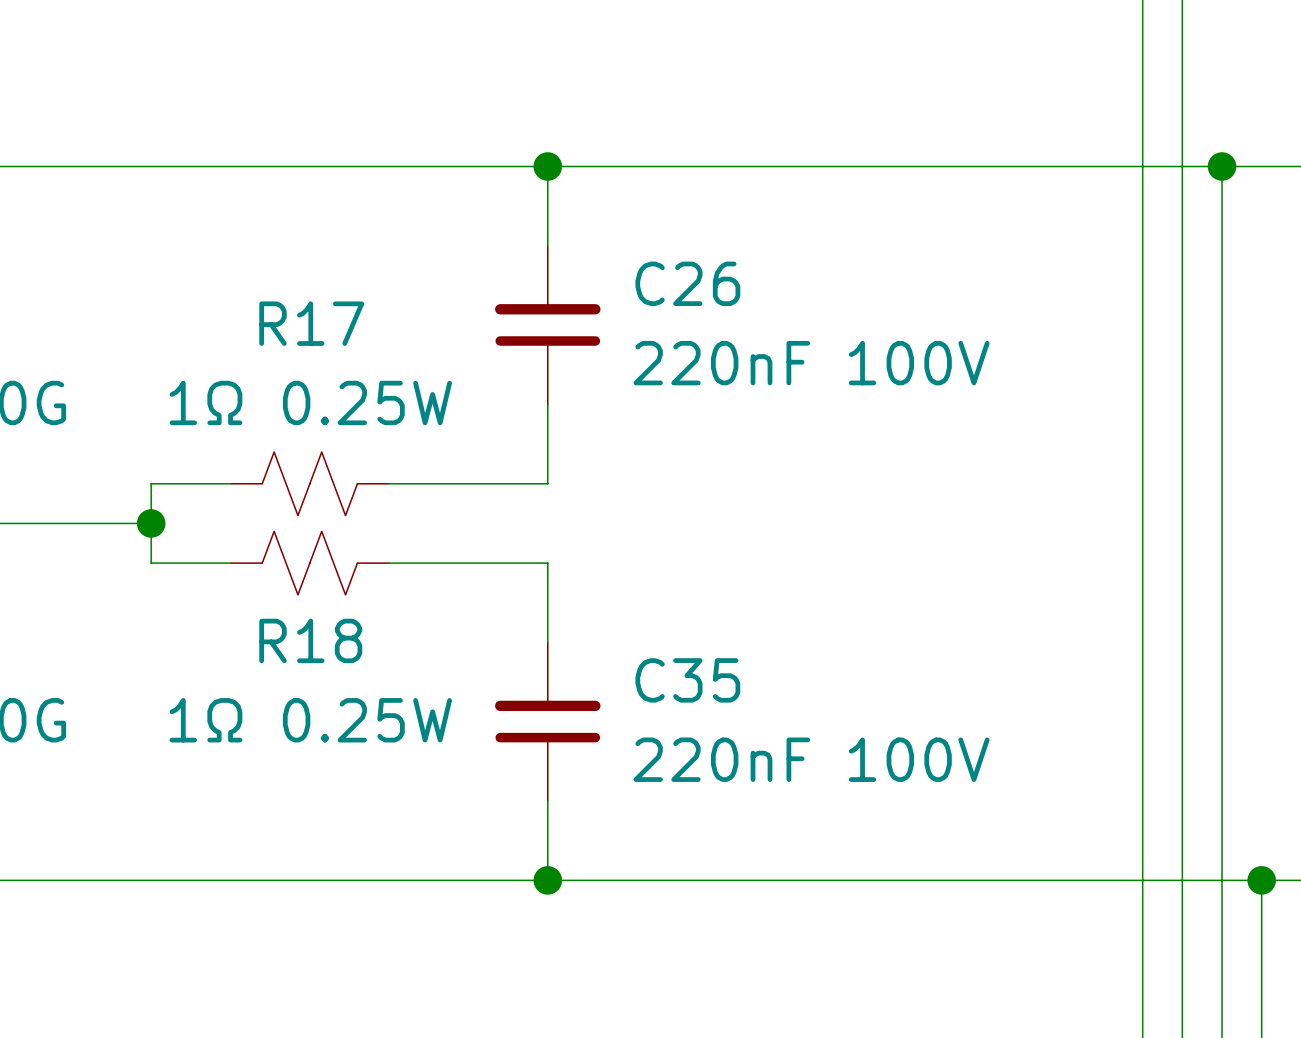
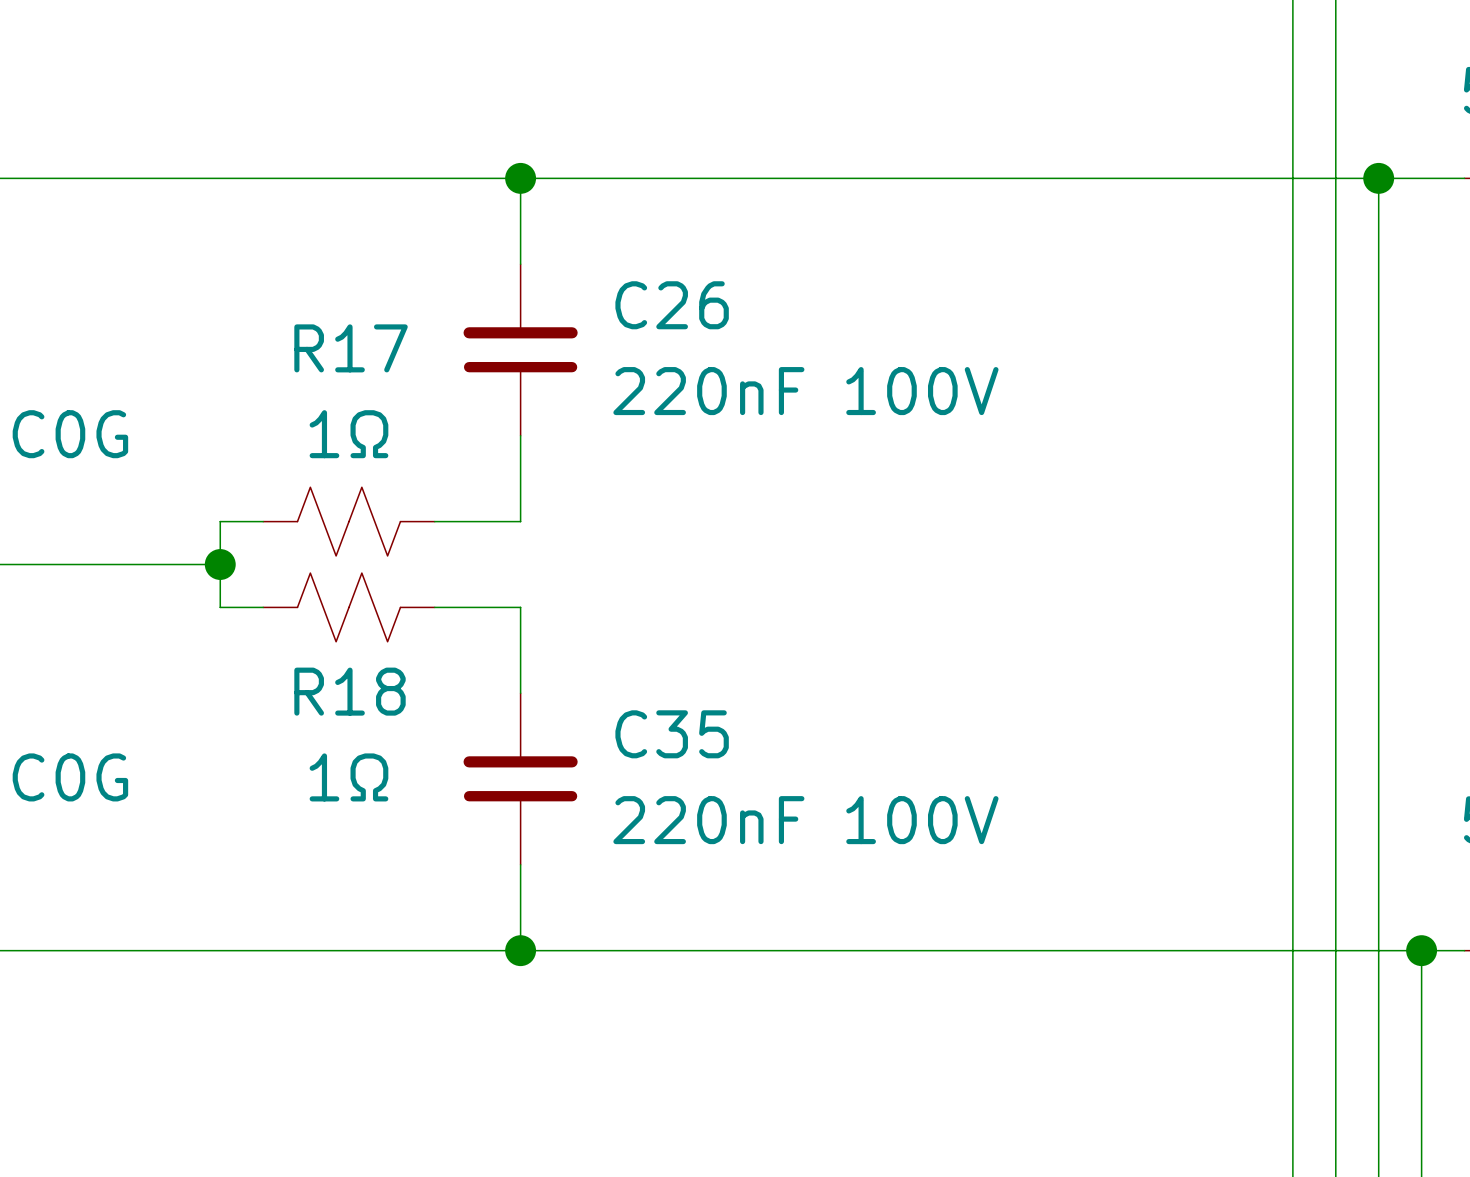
wire: (547, 166) (547, 245) -> (520, 178) (520, 264)
junction position: (547, 166) -> (520, 178)
C26 position: (547, 325) -> (520, 349)
R17 value: 1Ω 0.25W (310, 402) -> 1Ω (348, 434)
wire: (547, 404) (547, 483) (428, 483) -> (520, 435) (520, 521)
R17 position: (309, 483) -> (348, 521)
R18 position: (309, 563) -> (348, 607)
wire: (428, 563) (547, 563) (547, 642) -> (520, 607) (520, 693)
R18 value: 1Ω 0.25W (310, 720) -> 1Ω (348, 777)
C35 position: (547, 721) -> (520, 779)
wire: (547, 801) (547, 880) -> (520, 864) (520, 950)
junction position: (547, 880) -> (520, 950)

